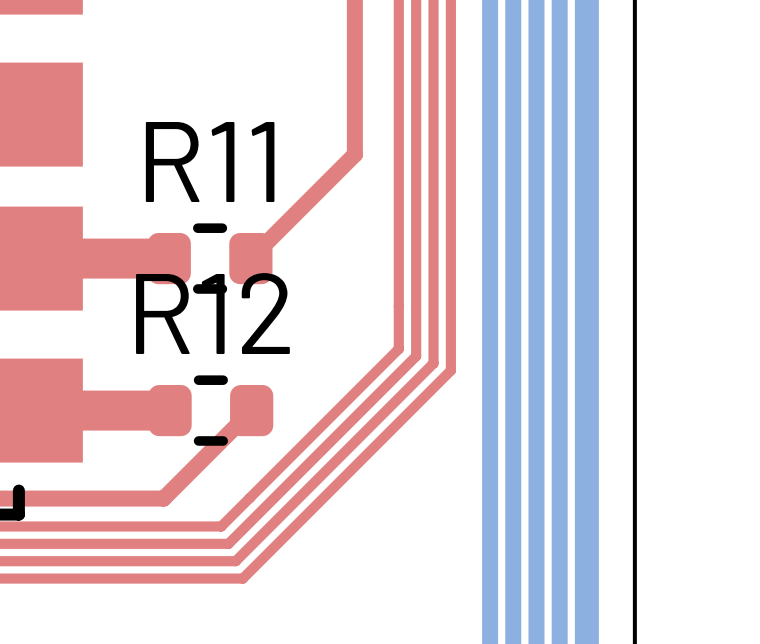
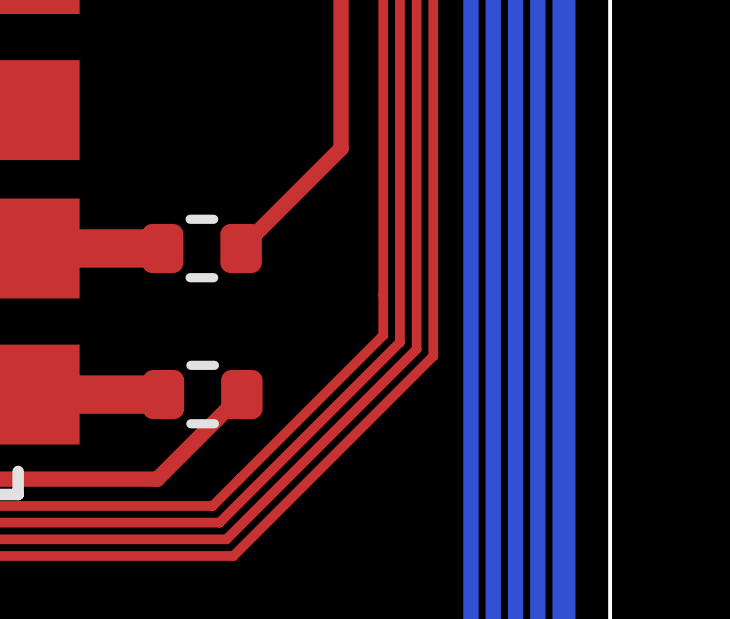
R11 name: R11 (210, 161) -> none
R12 name: R12 (212, 313) -> none

